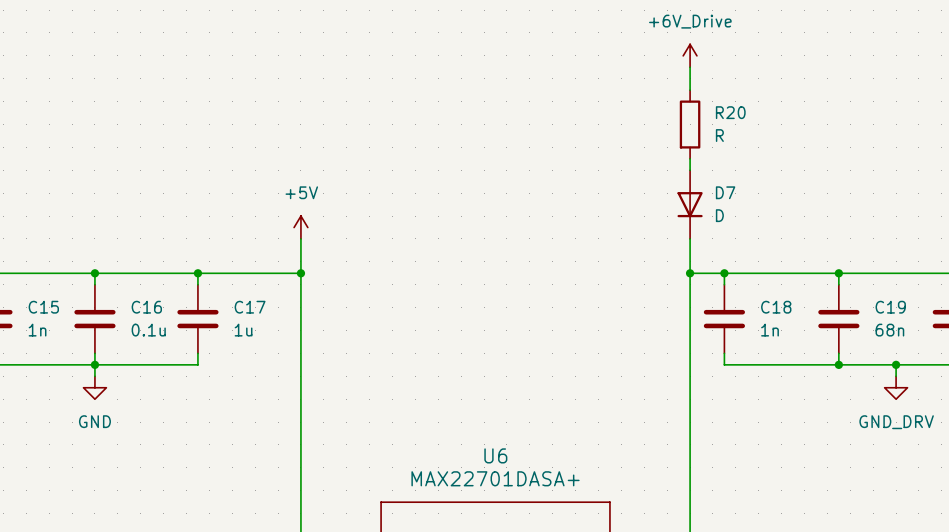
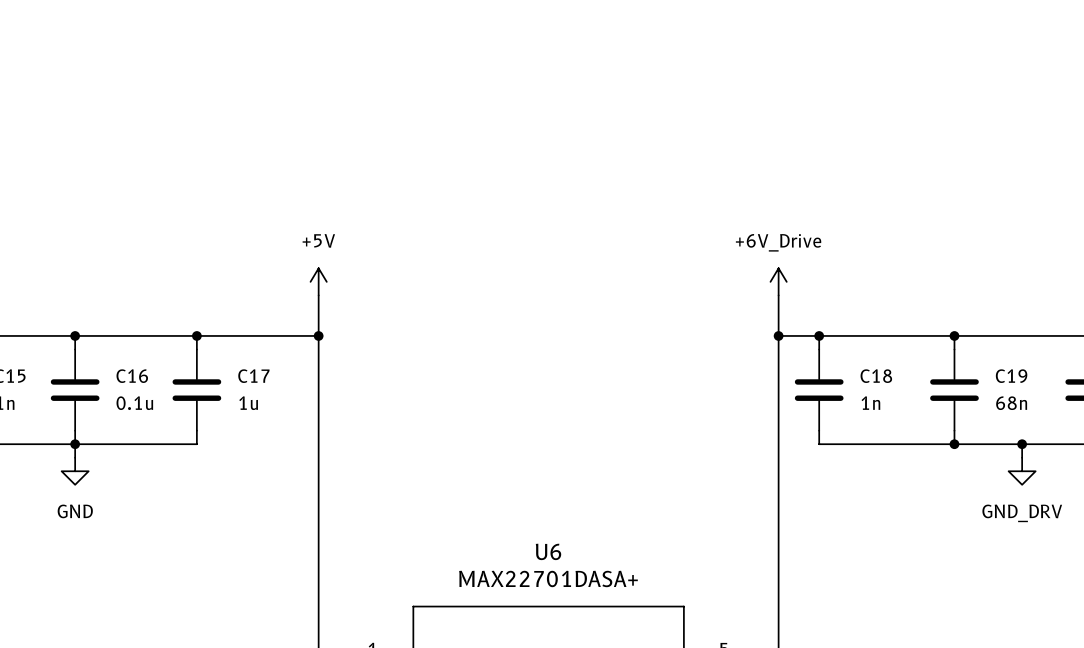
power symbol position: +6V_Drive (690, 55) -> +6V_Drive (778, 281)
wire: (690, 67) (690, 90) -> none
R20: R (690, 124) -> none
wire: (690, 158) (690, 170) -> none
D7: D (690, 204) -> none

